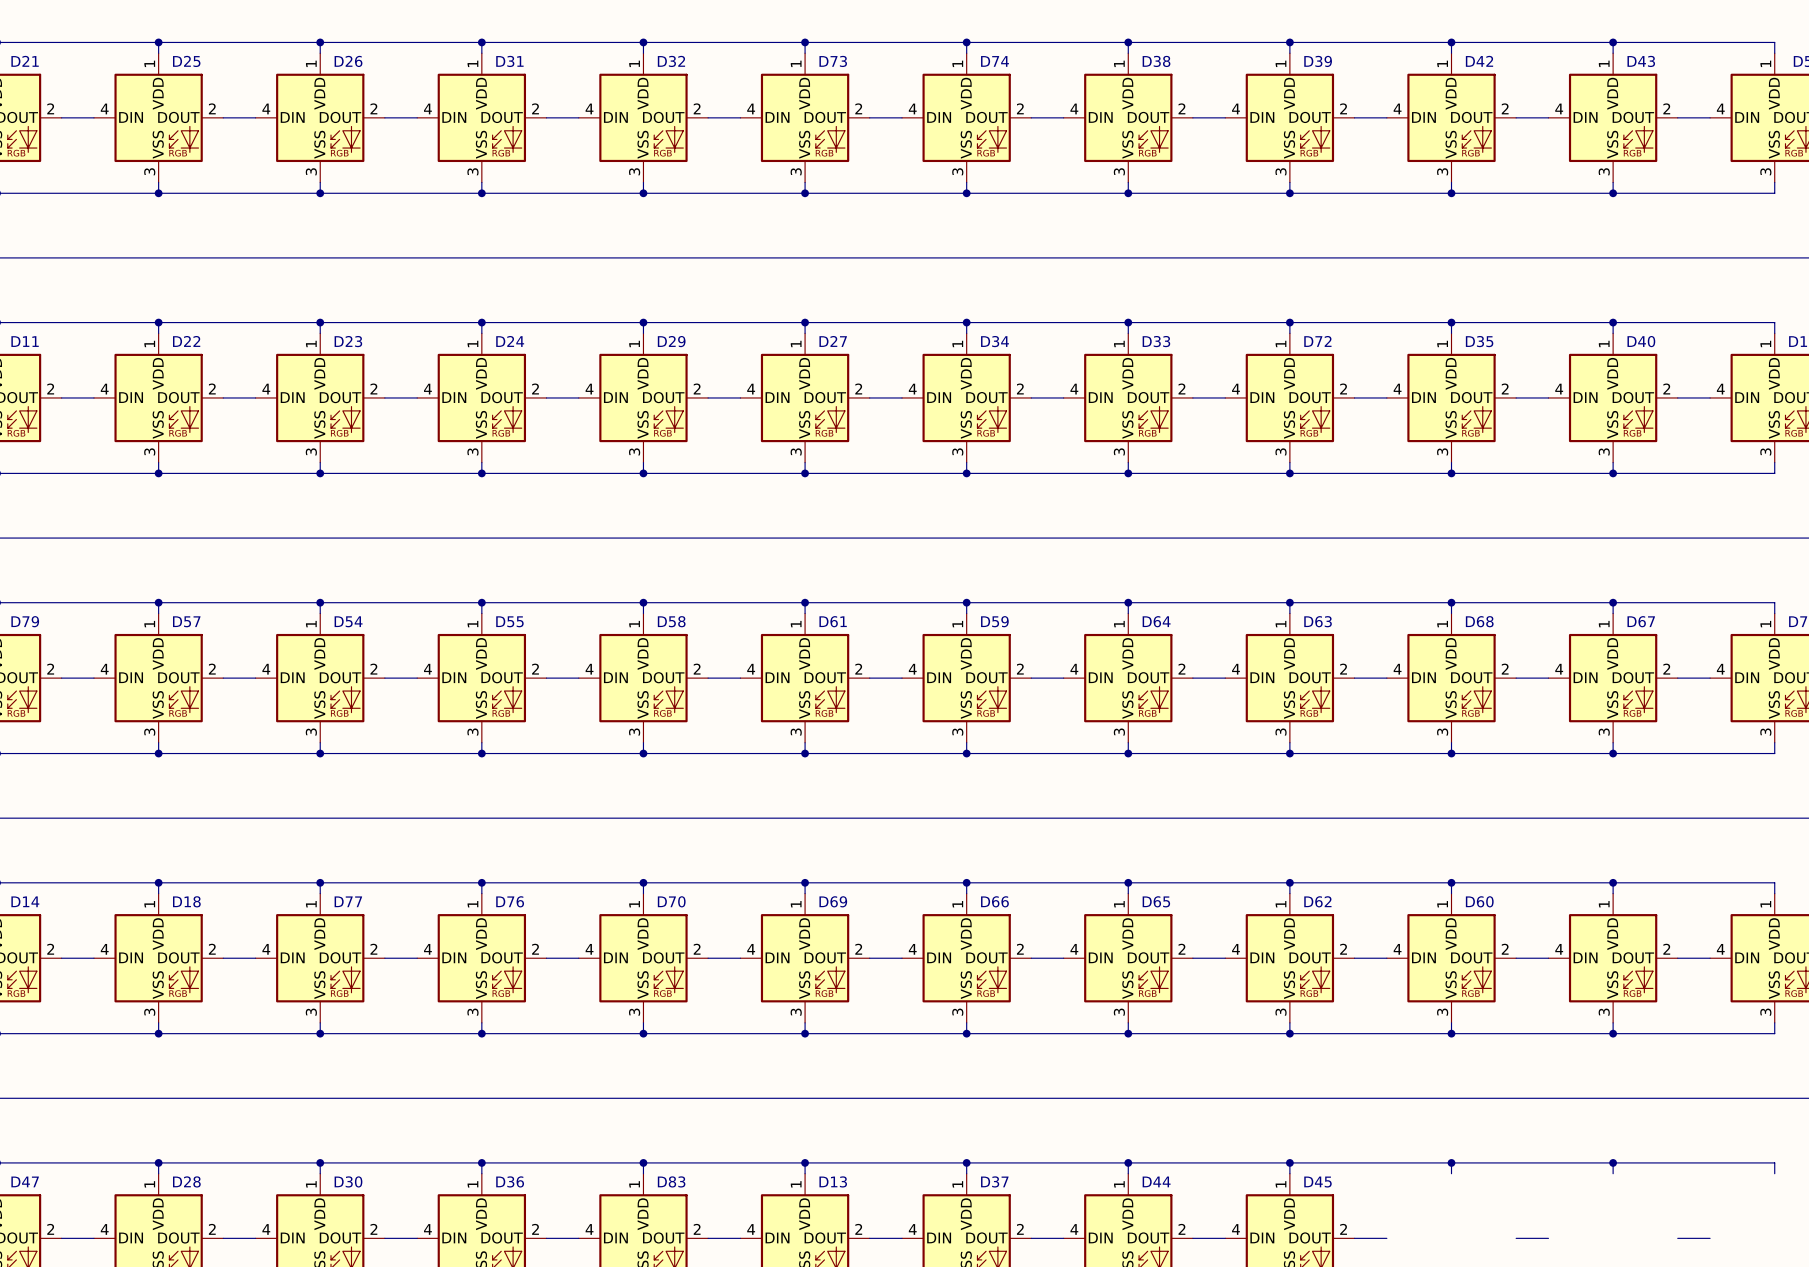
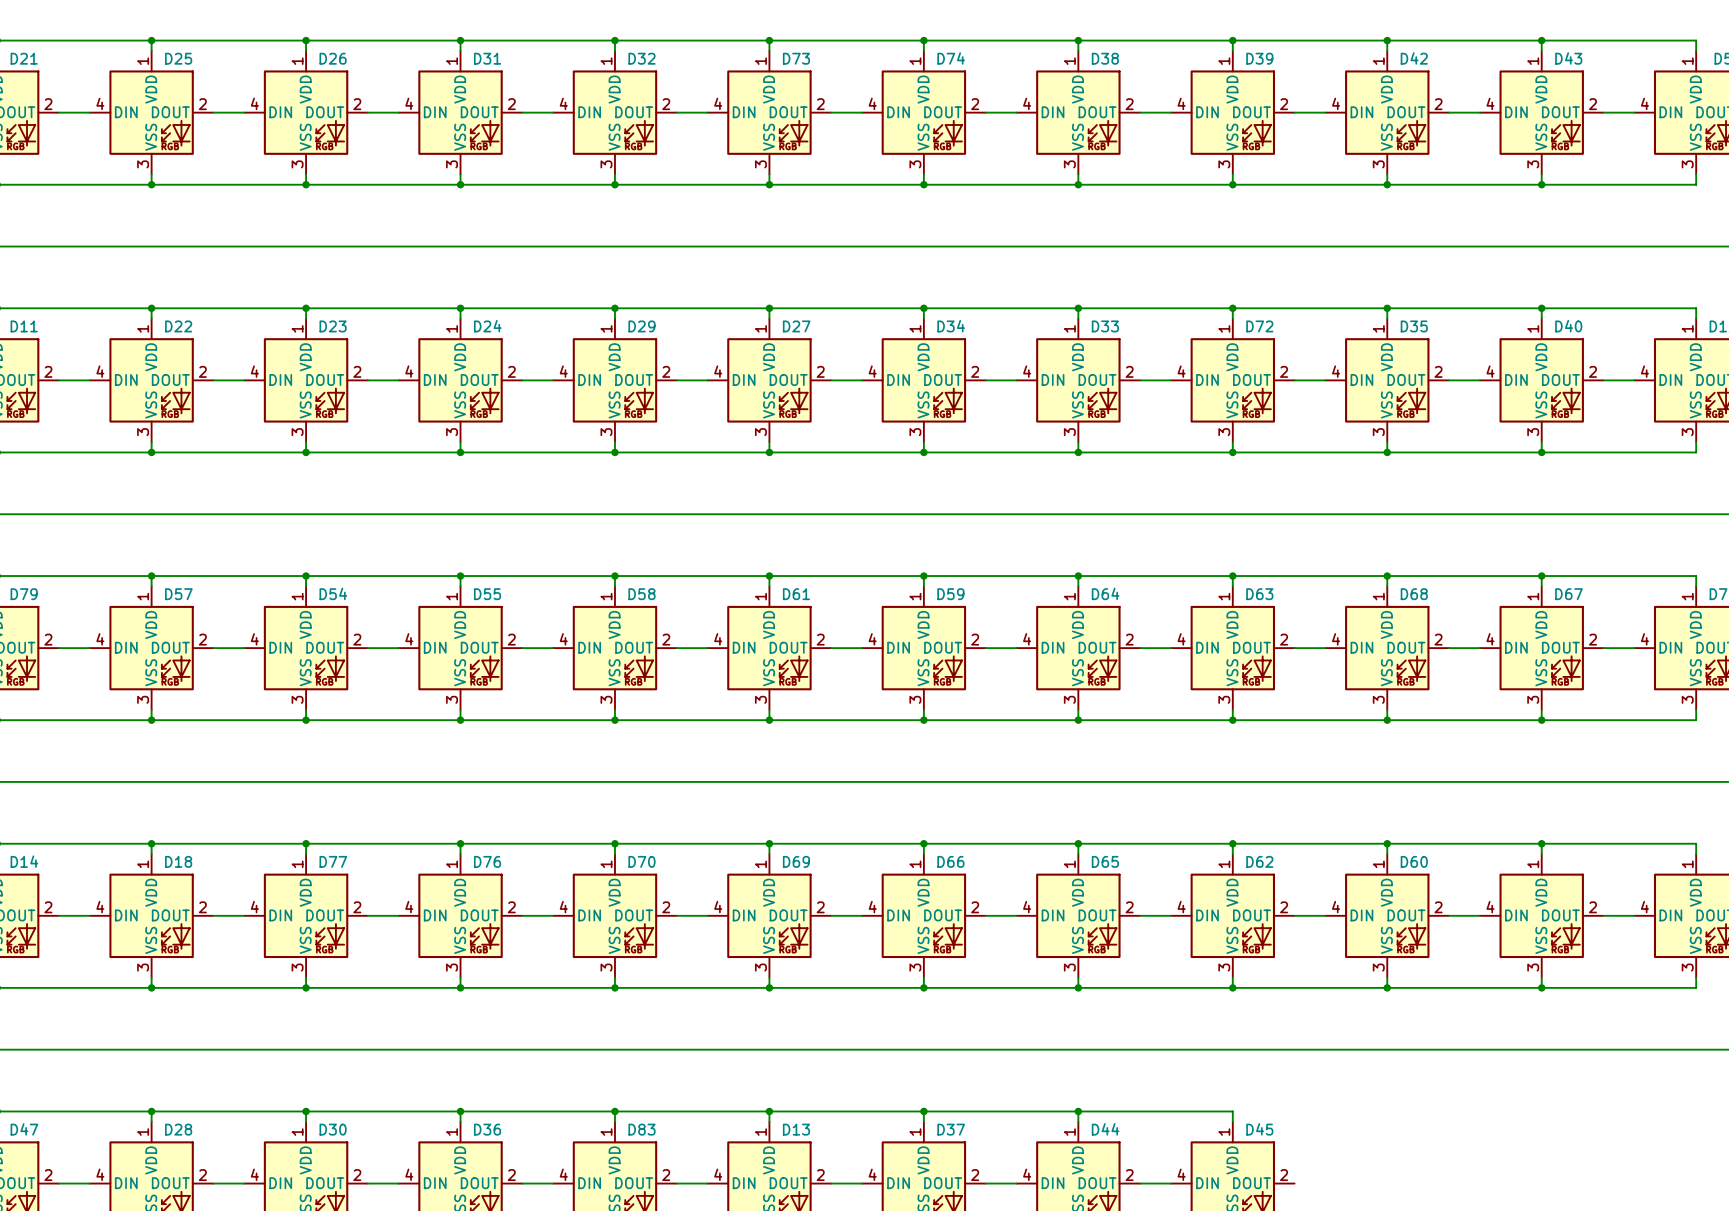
wire: (1289, 1162) (1774, 1162) (1774, 1173) -> none
junction: (1289, 1162) -> none
wire: (1451, 1162) (1451, 1173) -> none
junction: (1451, 1162) -> none
wire: (1613, 1162) (1613, 1173) -> none
junction: (1613, 1162) -> none
wire: (1354, 1238) (1386, 1238) -> none
wire: (1516, 1238) (1548, 1238) -> none
wire: (1677, 1238) (1710, 1238) -> none

